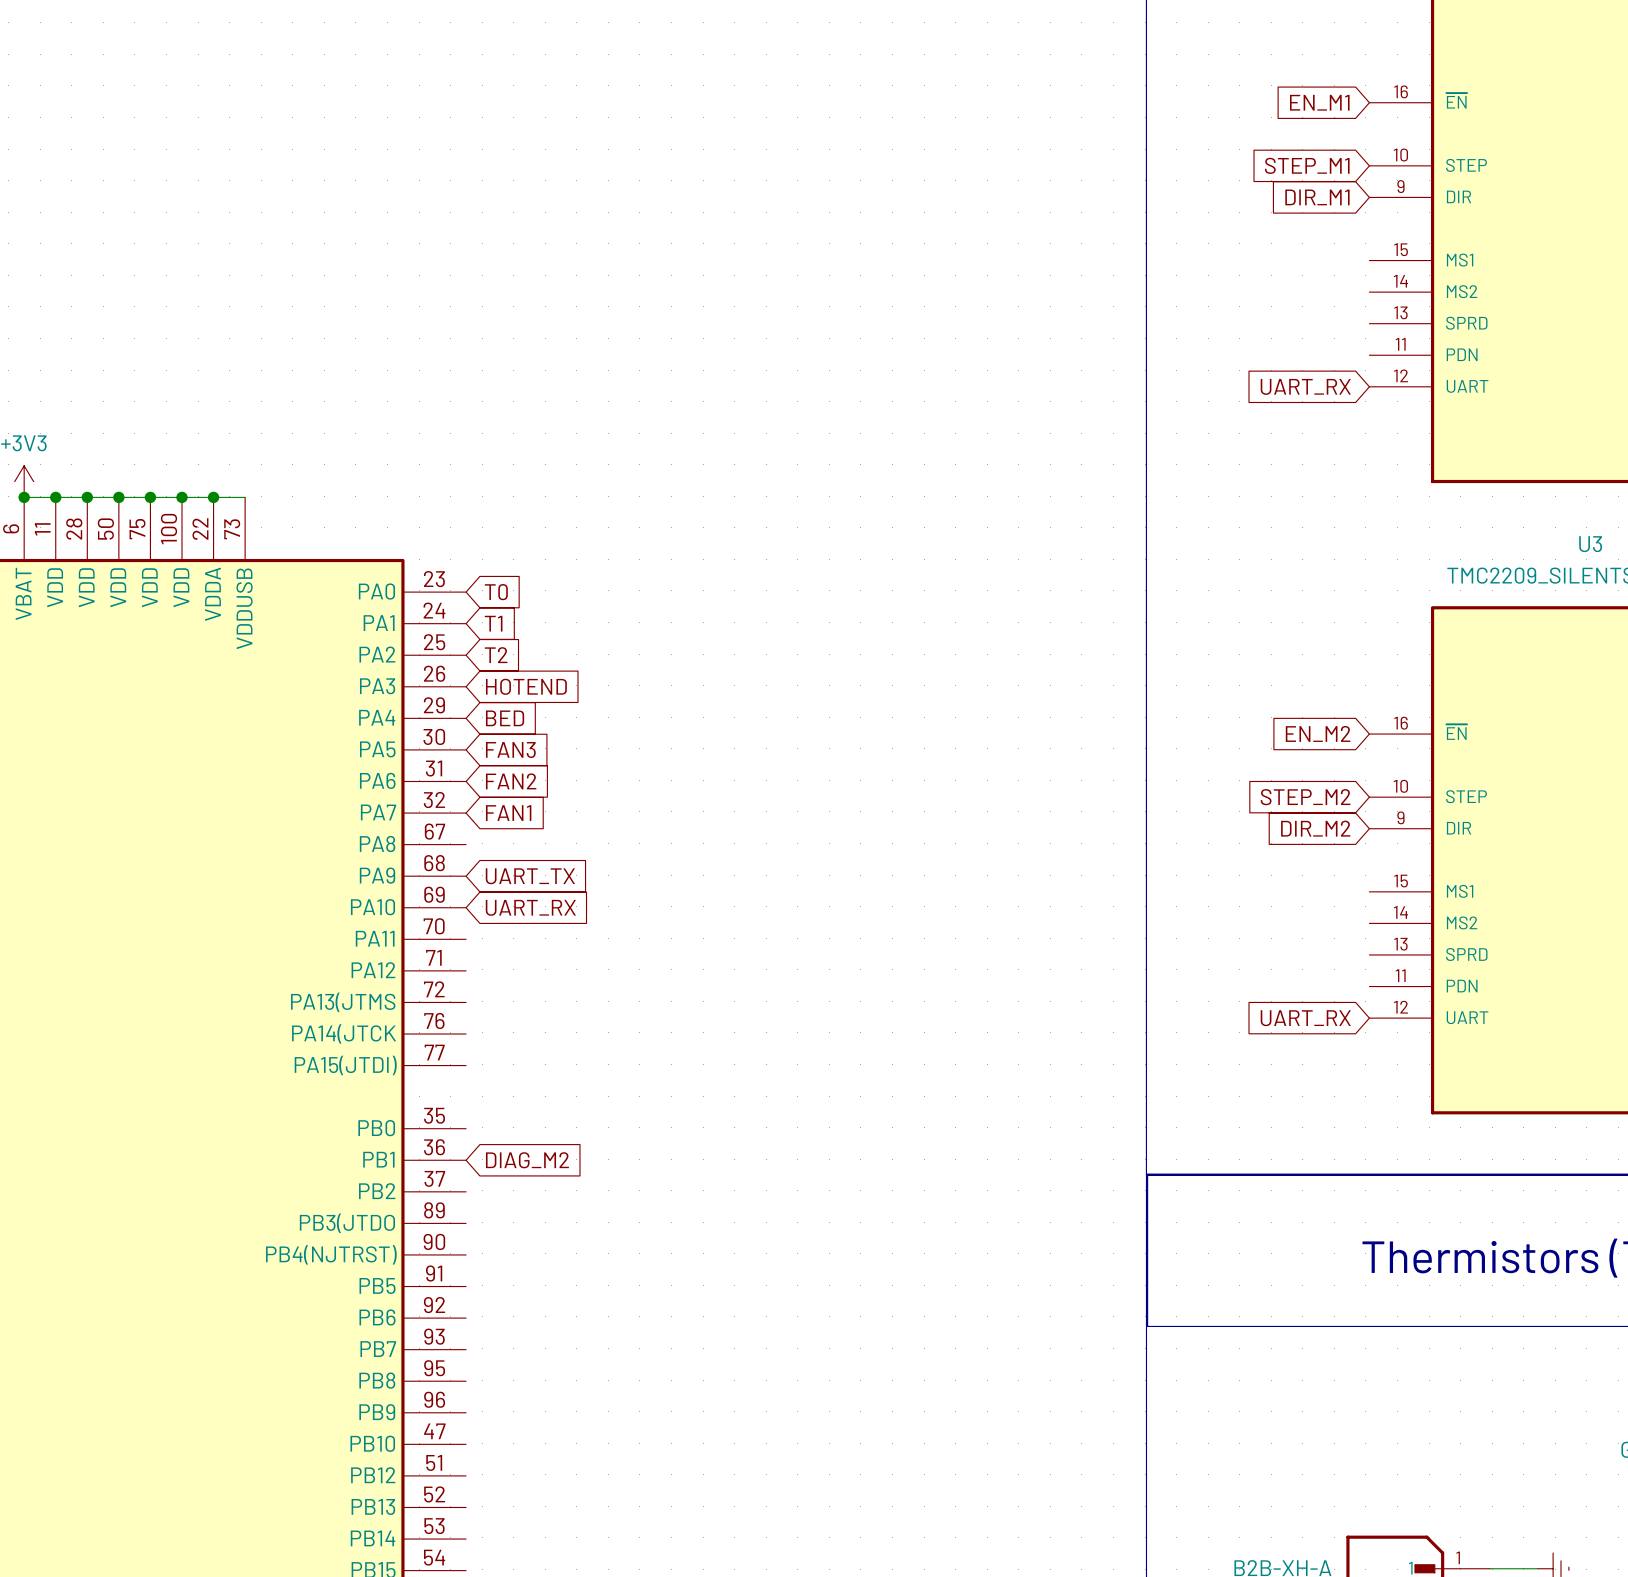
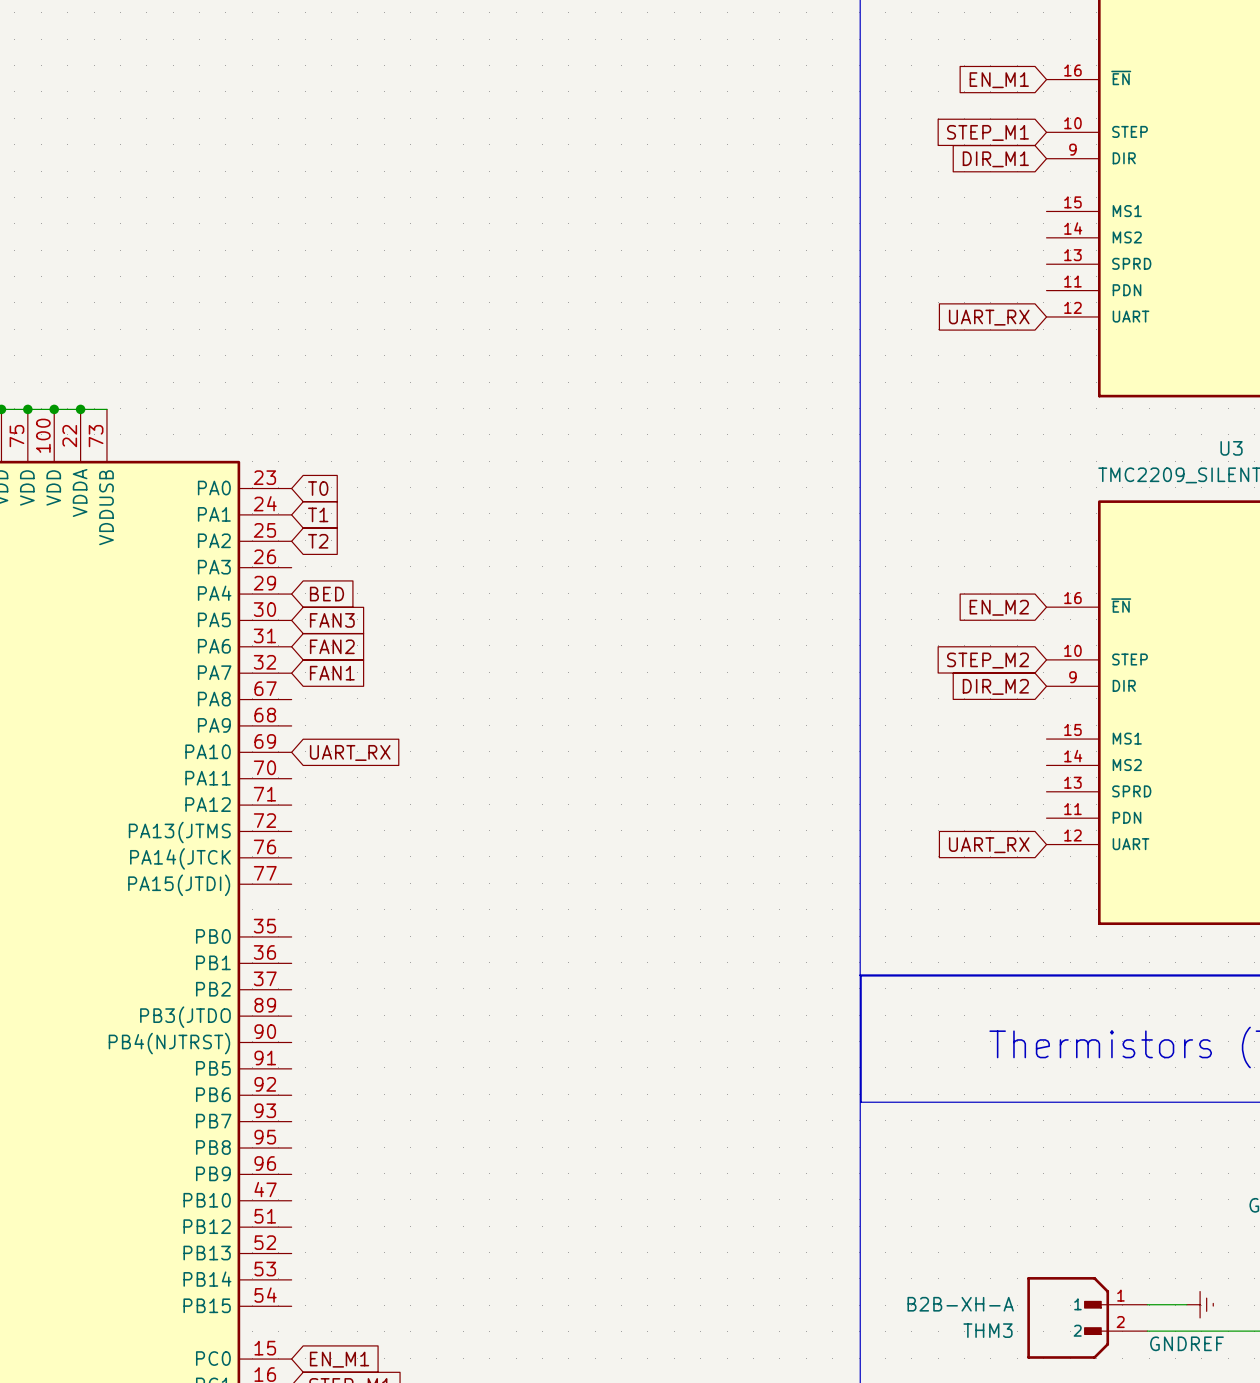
global label: HOTEND (526, 686) -> none
global label: UART_TX (530, 876) -> none
global label: DIAG_M2 (527, 1160) -> none

